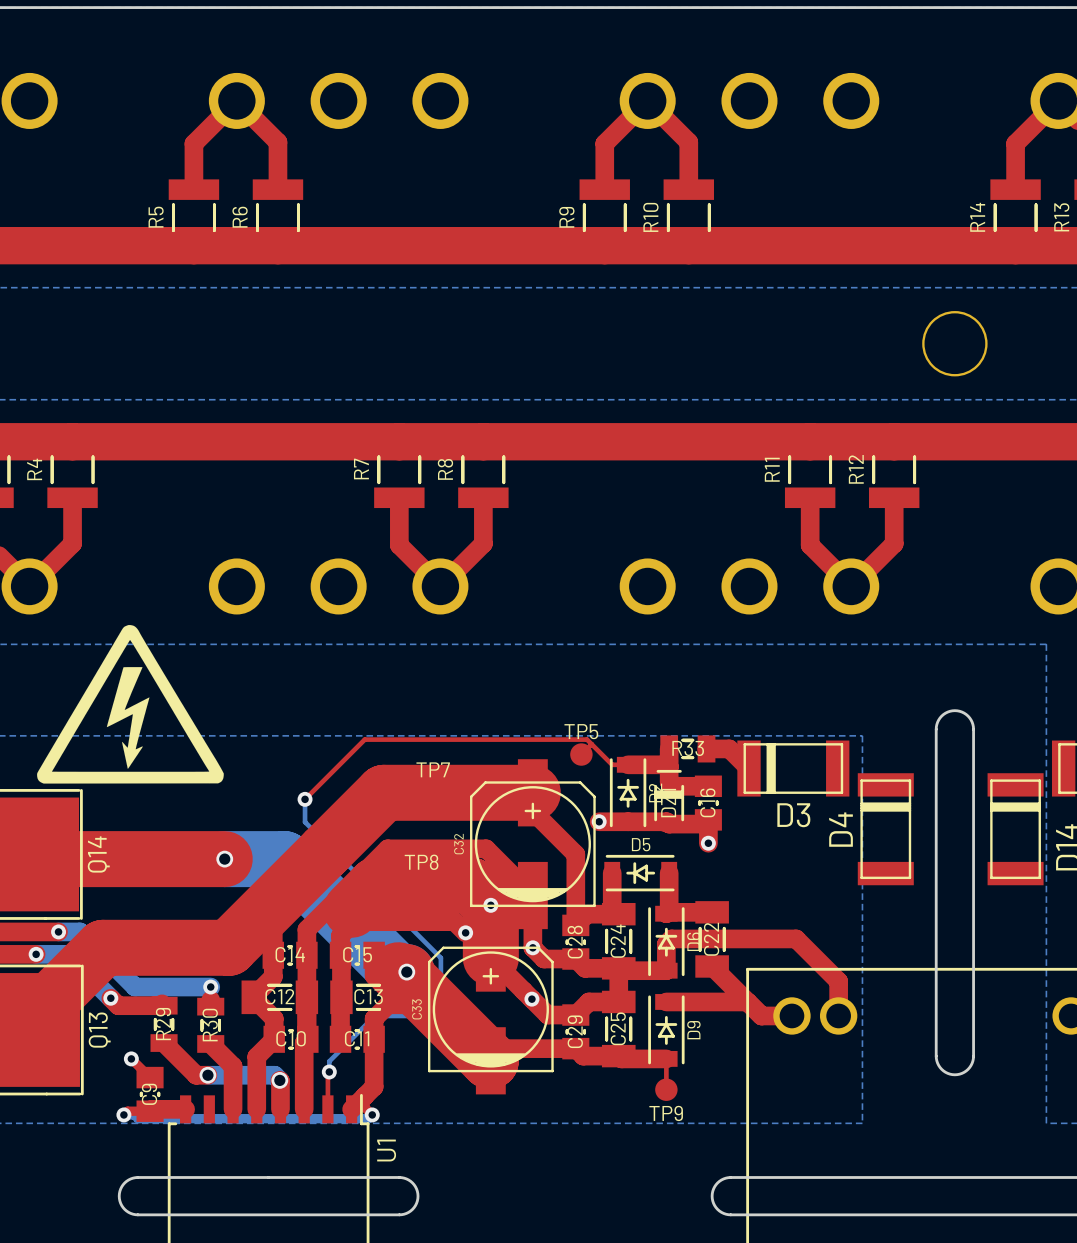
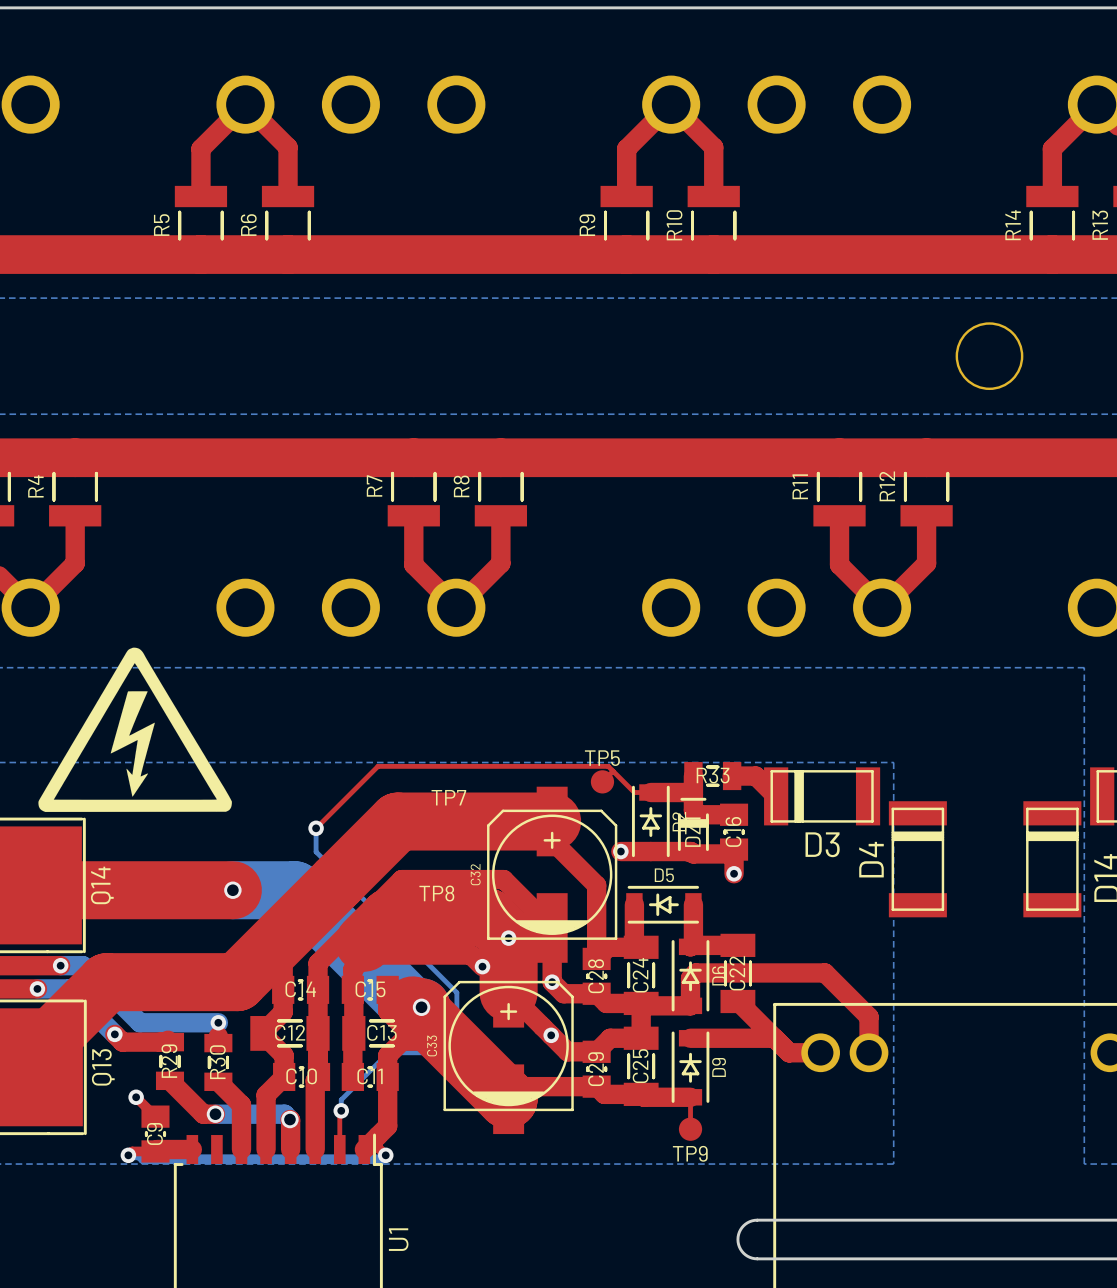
board edge: (936, 729) (936, 1056) (941, 1069) (954, 1074) (968, 1069) (973, 1056) (973, 729) (968, 716) (954, 710) (941, 716) (936, 729) -> none
U1 name position: U1 (386, 1150) -> U1 (398, 1239)
board edge: (137, 1177) (401, 1177) (414, 1184) (417, 1198) (412, 1209) (399, 1214) (135, 1214) (124, 1209) (119, 1196) (124, 1182) (137, 1177) -> none

